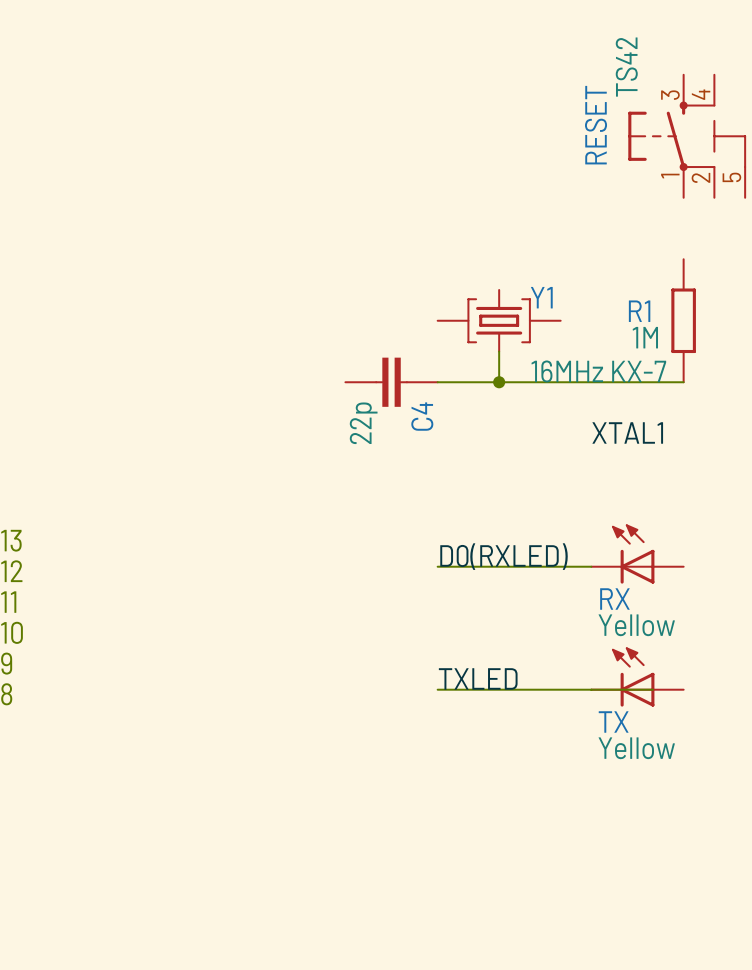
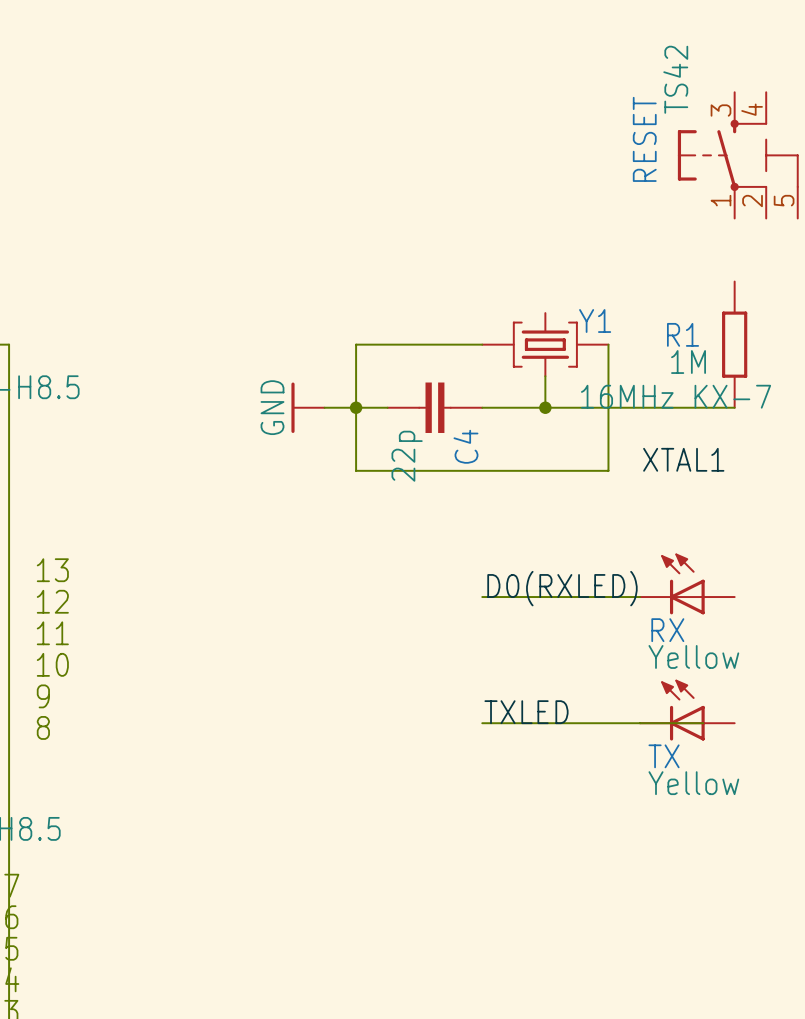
wire: none -> (482, 344) (356, 344) (356, 470) (608, 470) (608, 344)
power symbol: none -> GND (307, 407)
wire: none -> (324, 407) (387, 407)
junction: none -> (356, 407)

